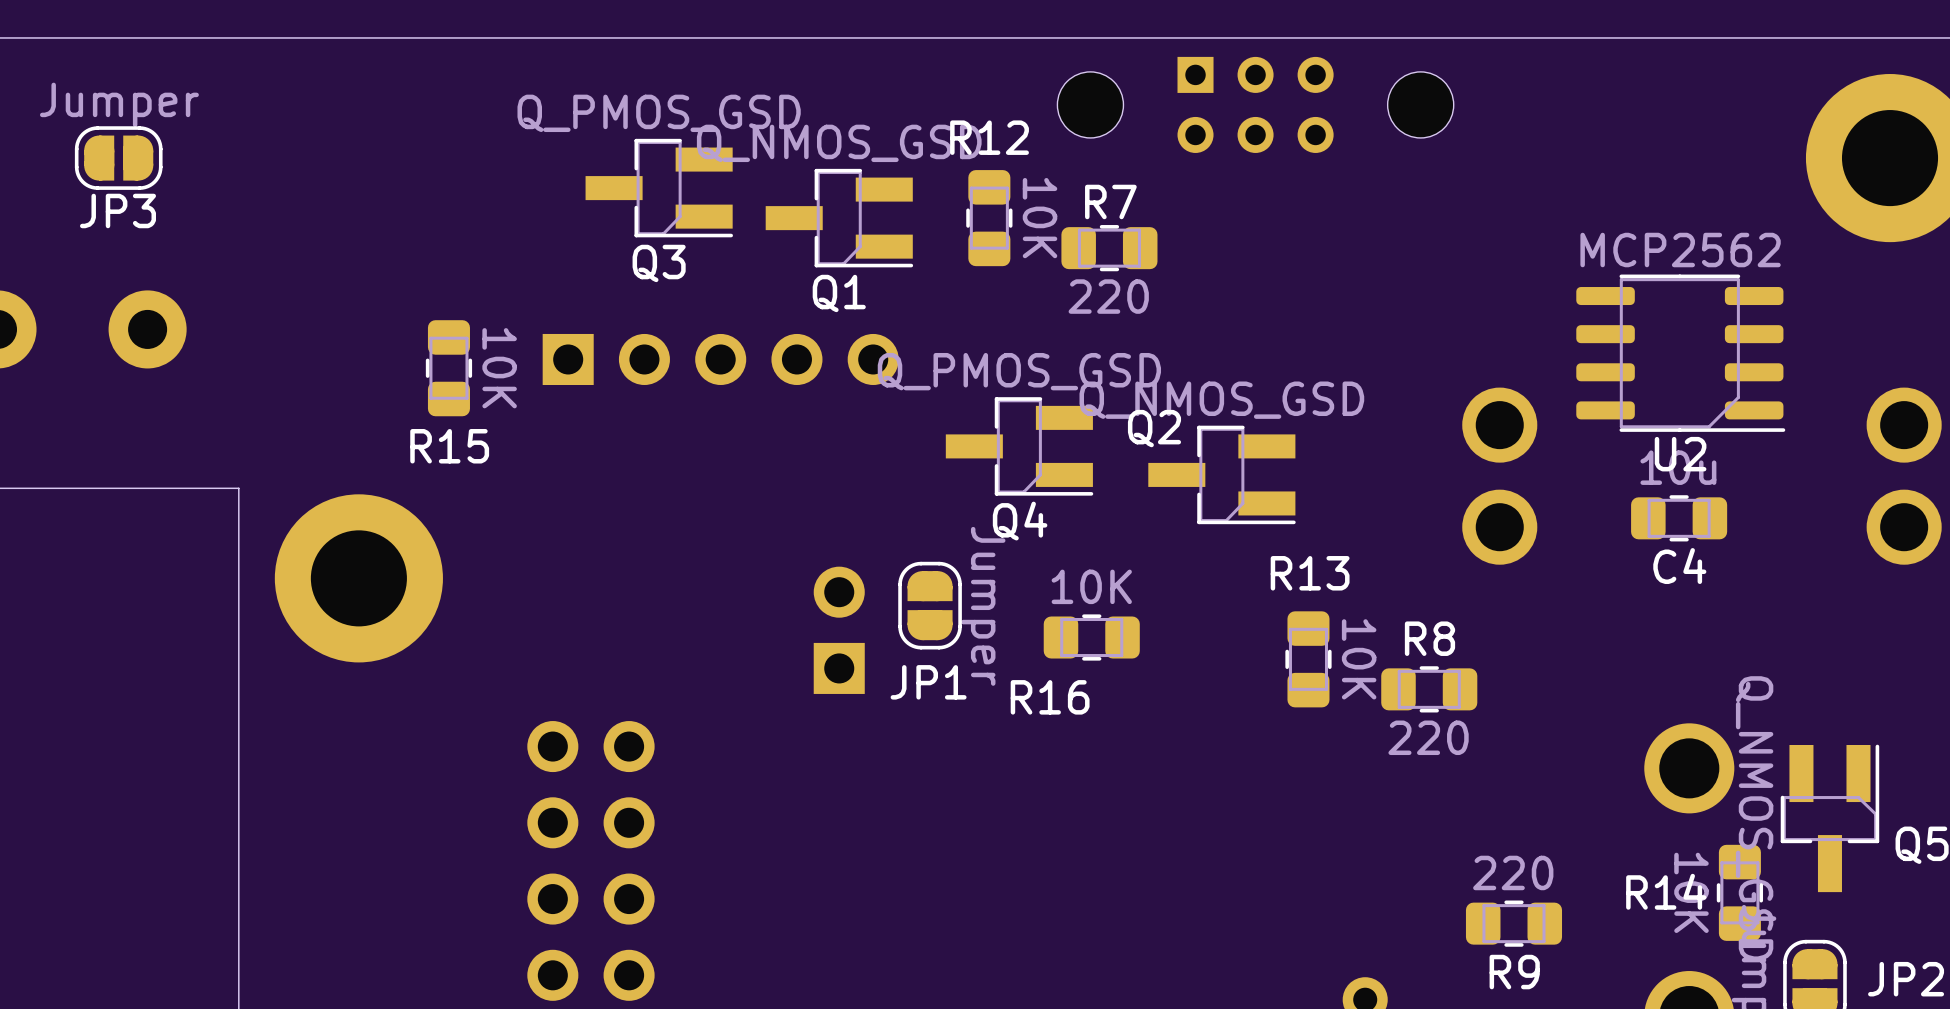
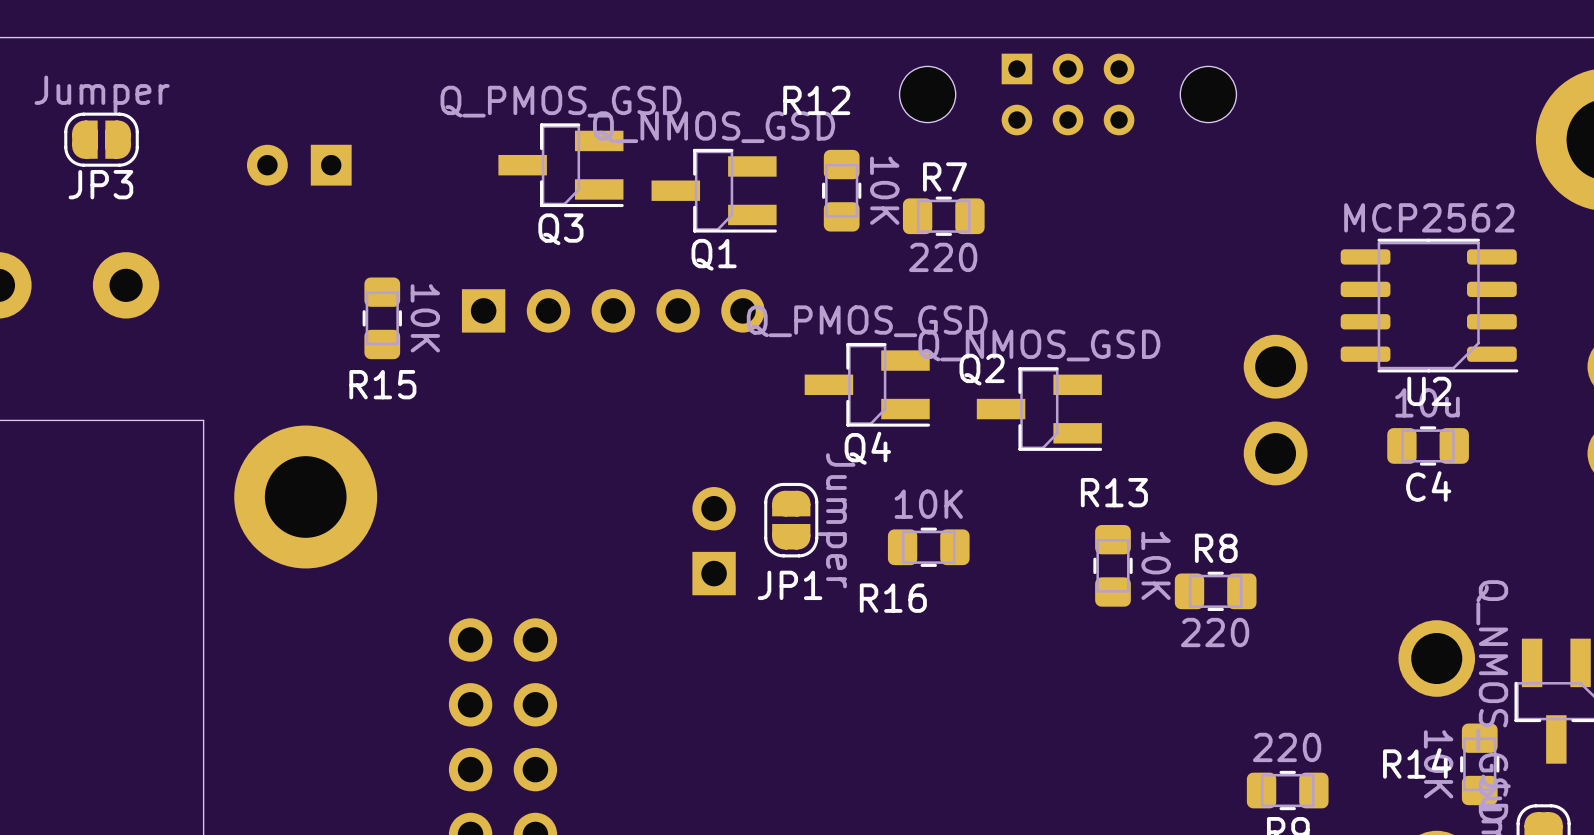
R12 name position: R12 (989, 137) -> R12 (816, 100)
part: none -> (299, 165)

